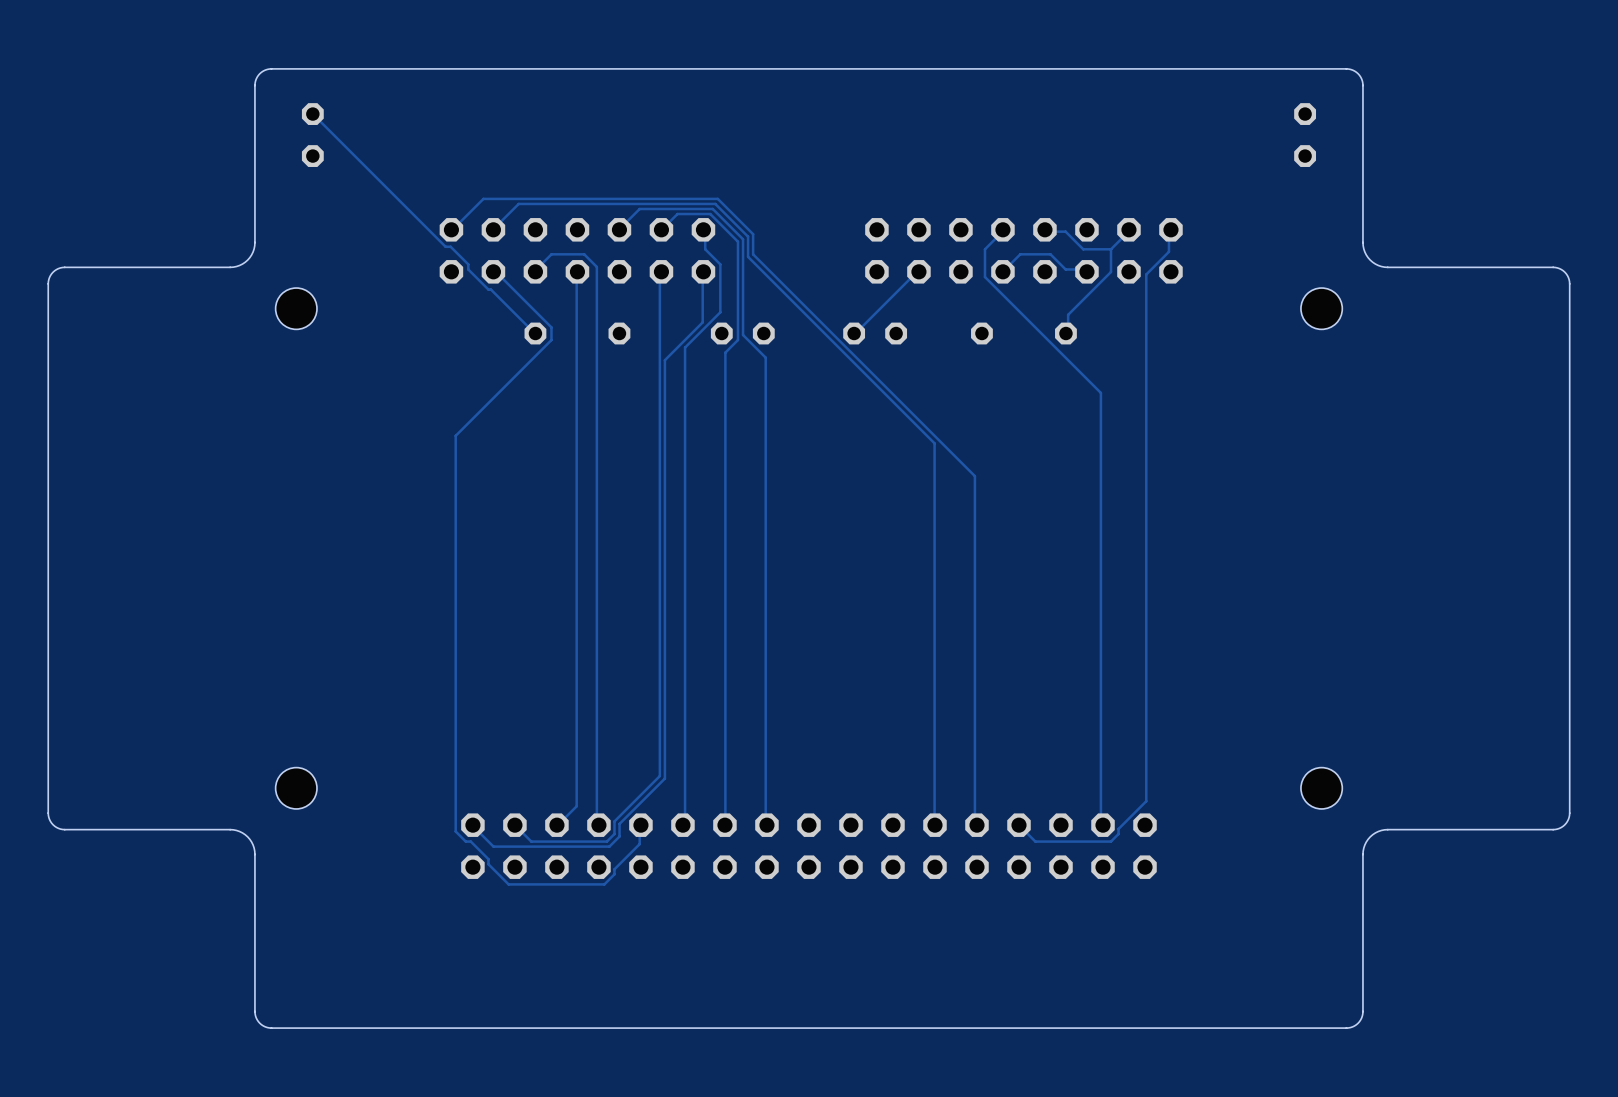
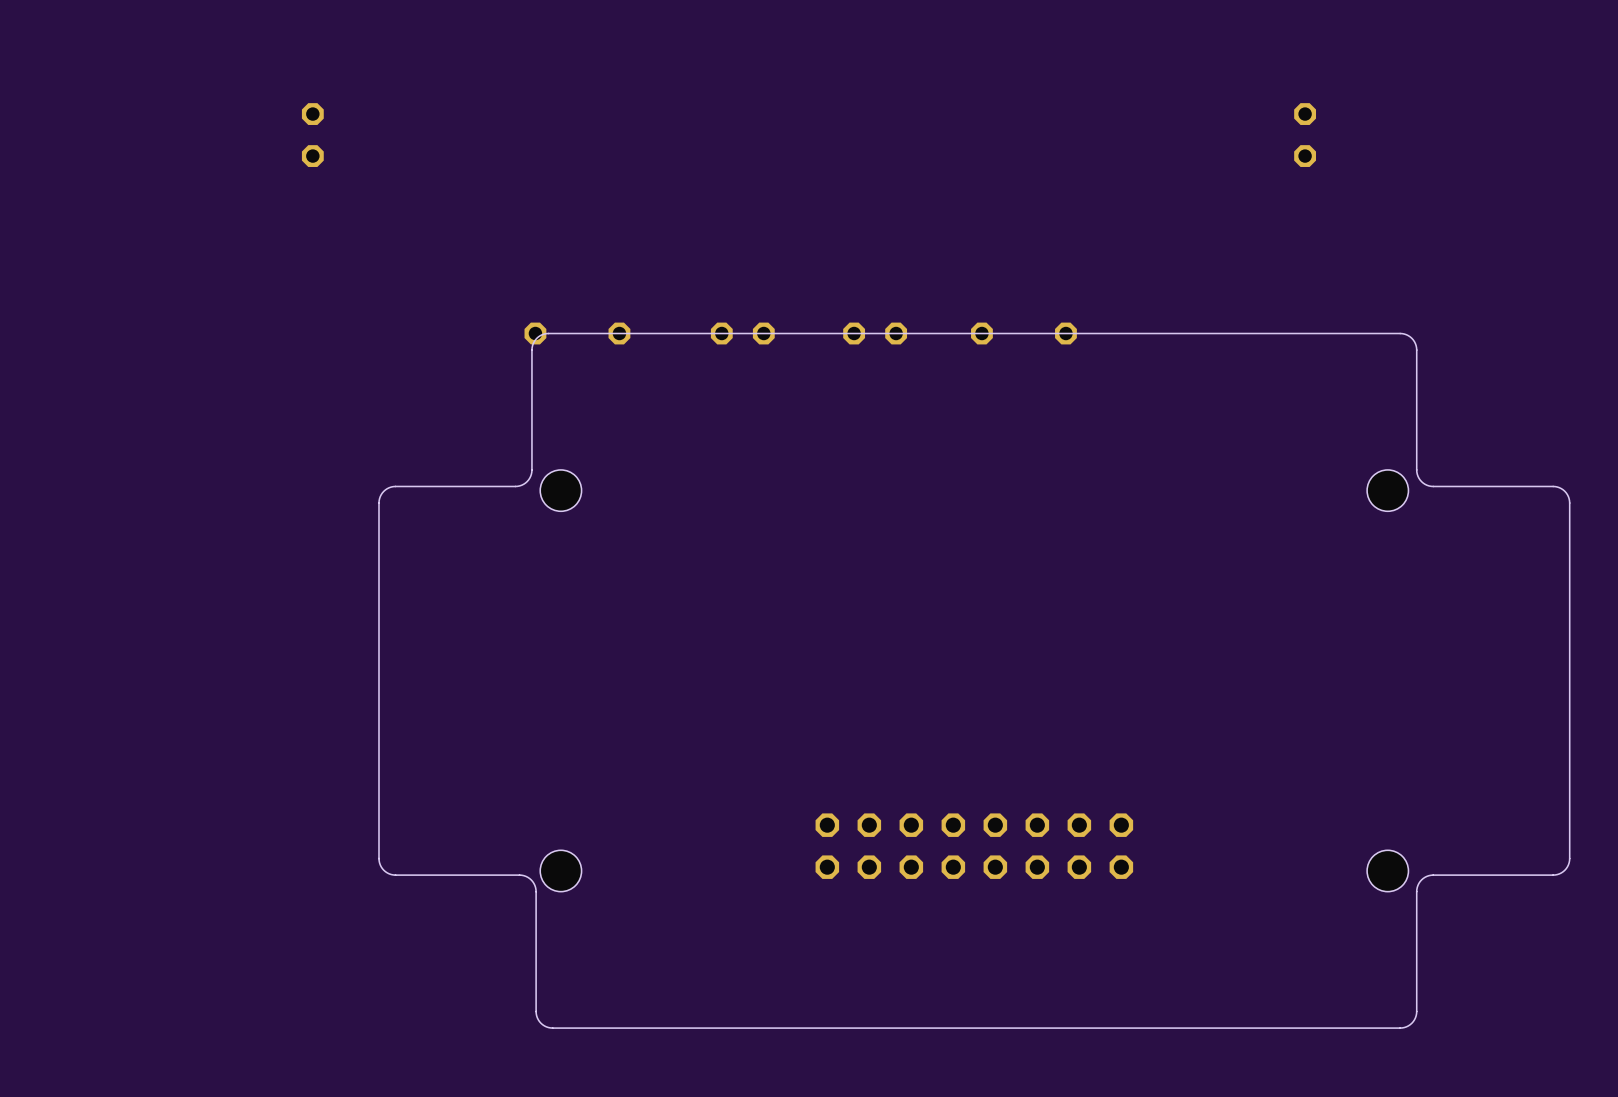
track: (312, 114) (445, 246) (450, 246) (468, 264) (468, 269) (535, 333) -> none
track: (451, 229) (483, 198) (717, 198) (753, 234) (753, 254) (974, 476) (974, 823) (976, 825) -> none
track: (493, 229) (518, 203) (715, 203) (748, 236) (748, 256) (934, 443) (934, 825) -> none
track: (619, 229) (639, 208) (712, 208) (743, 239) (743, 334) (765, 357) (766, 825) -> none
track: (661, 229) (677, 214) (710, 214) (737, 241) (737, 340) (725, 352) (724, 825) -> none
track: (703, 229) (705, 231) (705, 249) (720, 264) (720, 312) (685, 347) (685, 823) (682, 825) -> none
track: (1002, 229) (984, 249) (984, 277) (1100, 392) (1100, 823) (1103, 825) -> none
track: (1044, 229) (1045, 231) (1065, 231) (1083, 249) (1110, 249) -> none
track: (1128, 229) (1110, 249) -> none
track: (1170, 229) (1168, 231) (1168, 251) (1146, 274) (1146, 801) (1118, 828) (1118, 834) (1110, 841) (1035, 841) (1018, 825) -> none
track: (1110, 249) (1110, 271) (1068, 314) (1068, 332) (1065, 333) -> none
part: (577, 250) -> none
part: (1023, 250) -> none
track: (493, 271) (493, 269) (551, 327) (551, 340) (455, 435) (455, 831) (465, 841) (470, 841) (488, 859) (488, 864) (508, 884) (604, 884) (614, 874) (614, 869) (639, 844) (640, 825) -> none
track: (535, 271) (551, 254) (584, 254) (596, 266) (596, 823) (598, 825) -> none
track: (577, 271) (576, 806) (556, 825) -> none
track: (661, 271) (659, 271) (659, 776) (614, 821) (614, 834) (606, 841) (531, 841) (514, 825) -> none
track: (703, 271) (702, 322) (664, 360) (664, 778) (619, 823) (619, 836) (609, 846) (493, 846) (472, 825) -> none
track: (918, 271) (854, 333) -> none
track: (1086, 271) (1085, 269) (1065, 269) (1050, 254) (1020, 254) (1002, 271) -> none
hole: (296, 308) -> none
hole: (1321, 308) -> none
hole: none -> (560, 490)
hole: none -> (1387, 490)
board edge: (1569, 503) (1569, 283) (1567, 275) (1563, 270) (1555, 267) (1387, 267) (1378, 265) (1370, 260) (1364, 252) (1362, 242) (1362, 83) (1359, 75) (1350, 69) (271, 68) (263, 71) (258, 75) (255, 83) (254, 242) (253, 252) (247, 260) (239, 265) (230, 267) (62, 267) (54, 270) (48, 279) (48, 817) (54, 826) (62, 829) (230, 829) (239, 831) (247, 836) (253, 844) (254, 854) (255, 1013) (258, 1021) (265, 1026) (552, 1028) -> (1569, 503) (1566, 492) (1555, 486) (1433, 486) (1421, 481) (1416, 469) (1416, 347) (1411, 338) (1402, 333) (548, 333) (540, 335) (535, 339) (532, 347) (531, 469) (527, 481) (515, 486) (393, 486) (385, 489) (379, 498) (378, 858) (382, 868) (393, 874) (519, 875) (531, 879) (536, 891) (536, 1013) (542, 1024) (552, 1028)
hole: (296, 788) -> none
hole position: (1321, 788) -> (1387, 870)
board edge: (1569, 813) (1566, 823) (1555, 829) (1387, 829) (1378, 831) (1370, 836) (1364, 844) (1362, 854) (1362, 1013) (1356, 1024) (1346, 1028) -> (1569, 813) (1569, 860) (1566, 868) (1559, 873) (1433, 875) (1421, 879) (1416, 891) (1416, 1011) (1414, 1019) (1410, 1024) (1402, 1027) (1346, 1028)
part: (808, 846) -> none
part: none -> (974, 846)
hole: none -> (560, 870)

